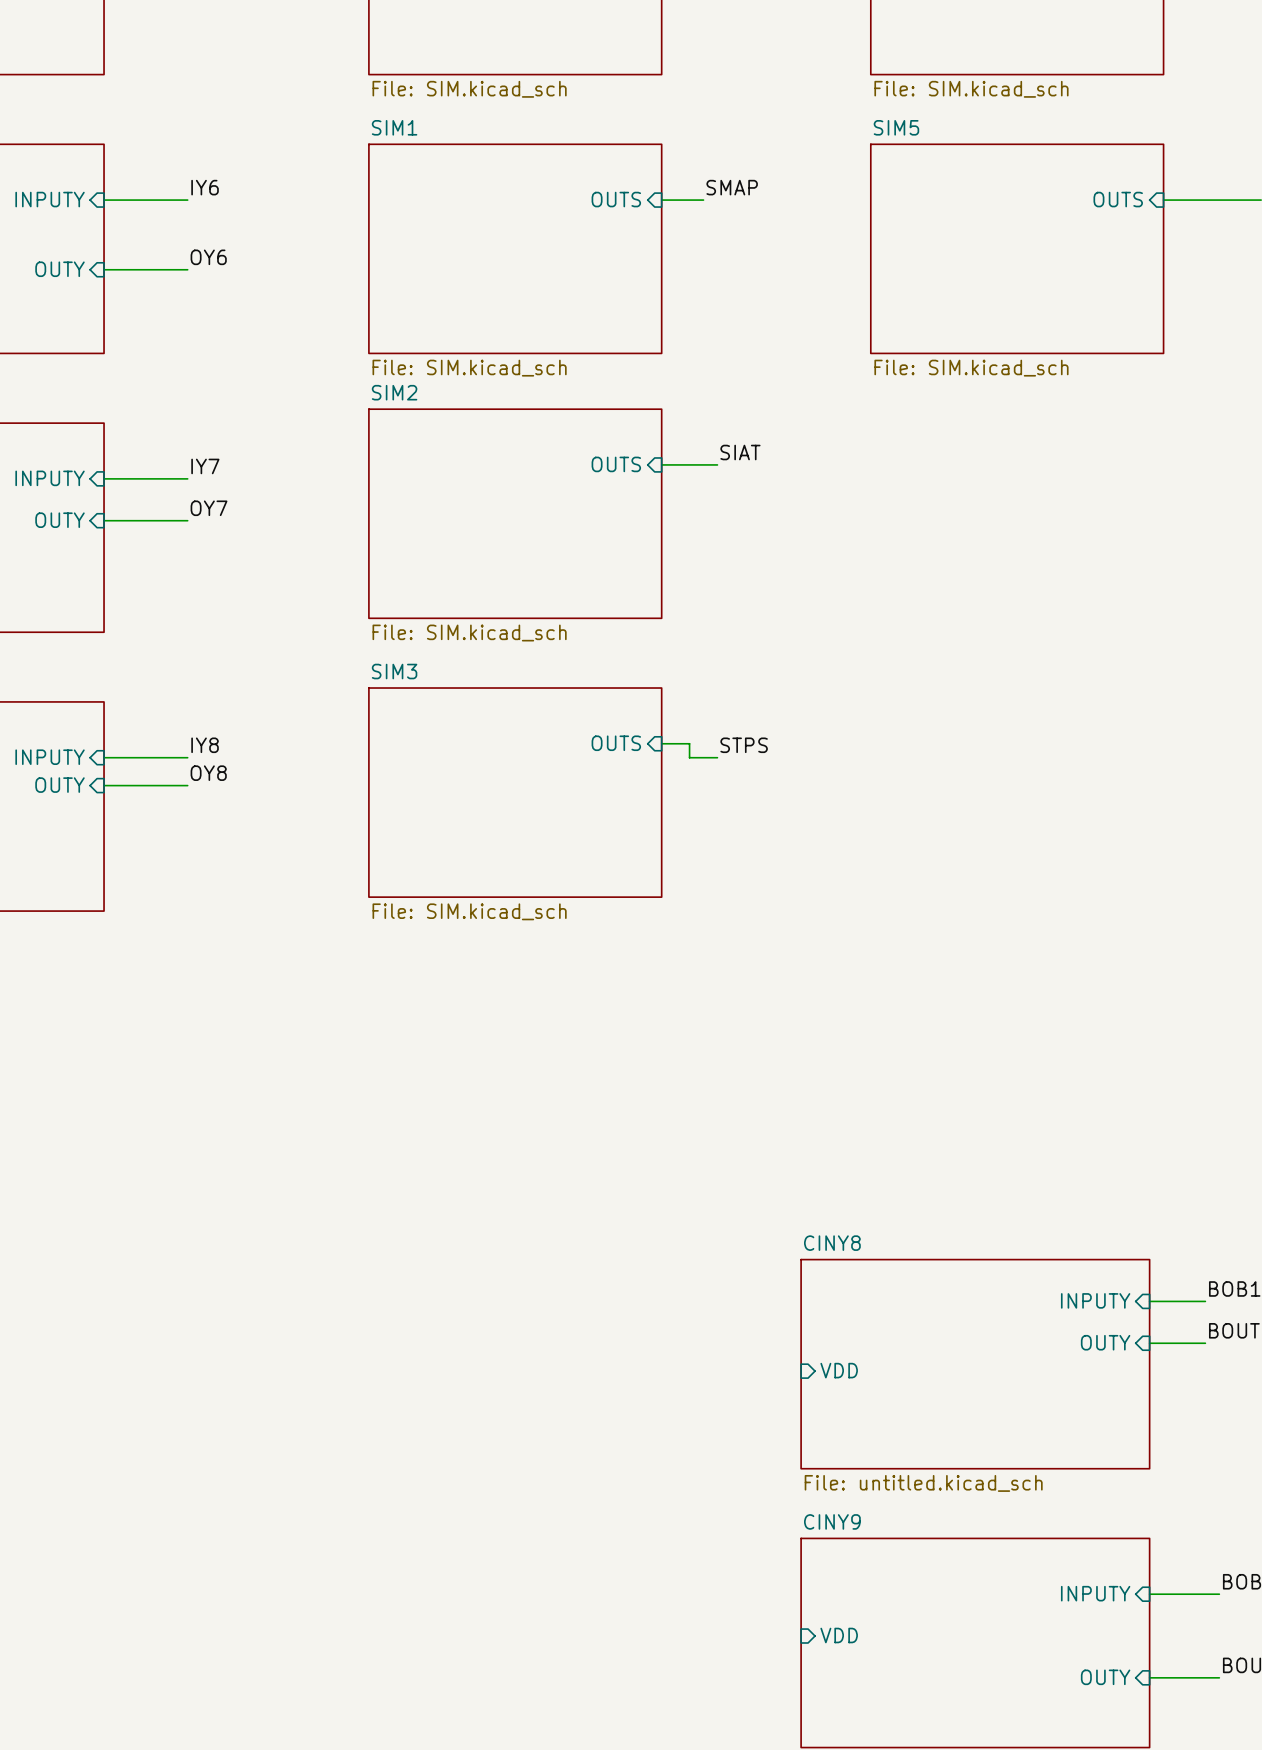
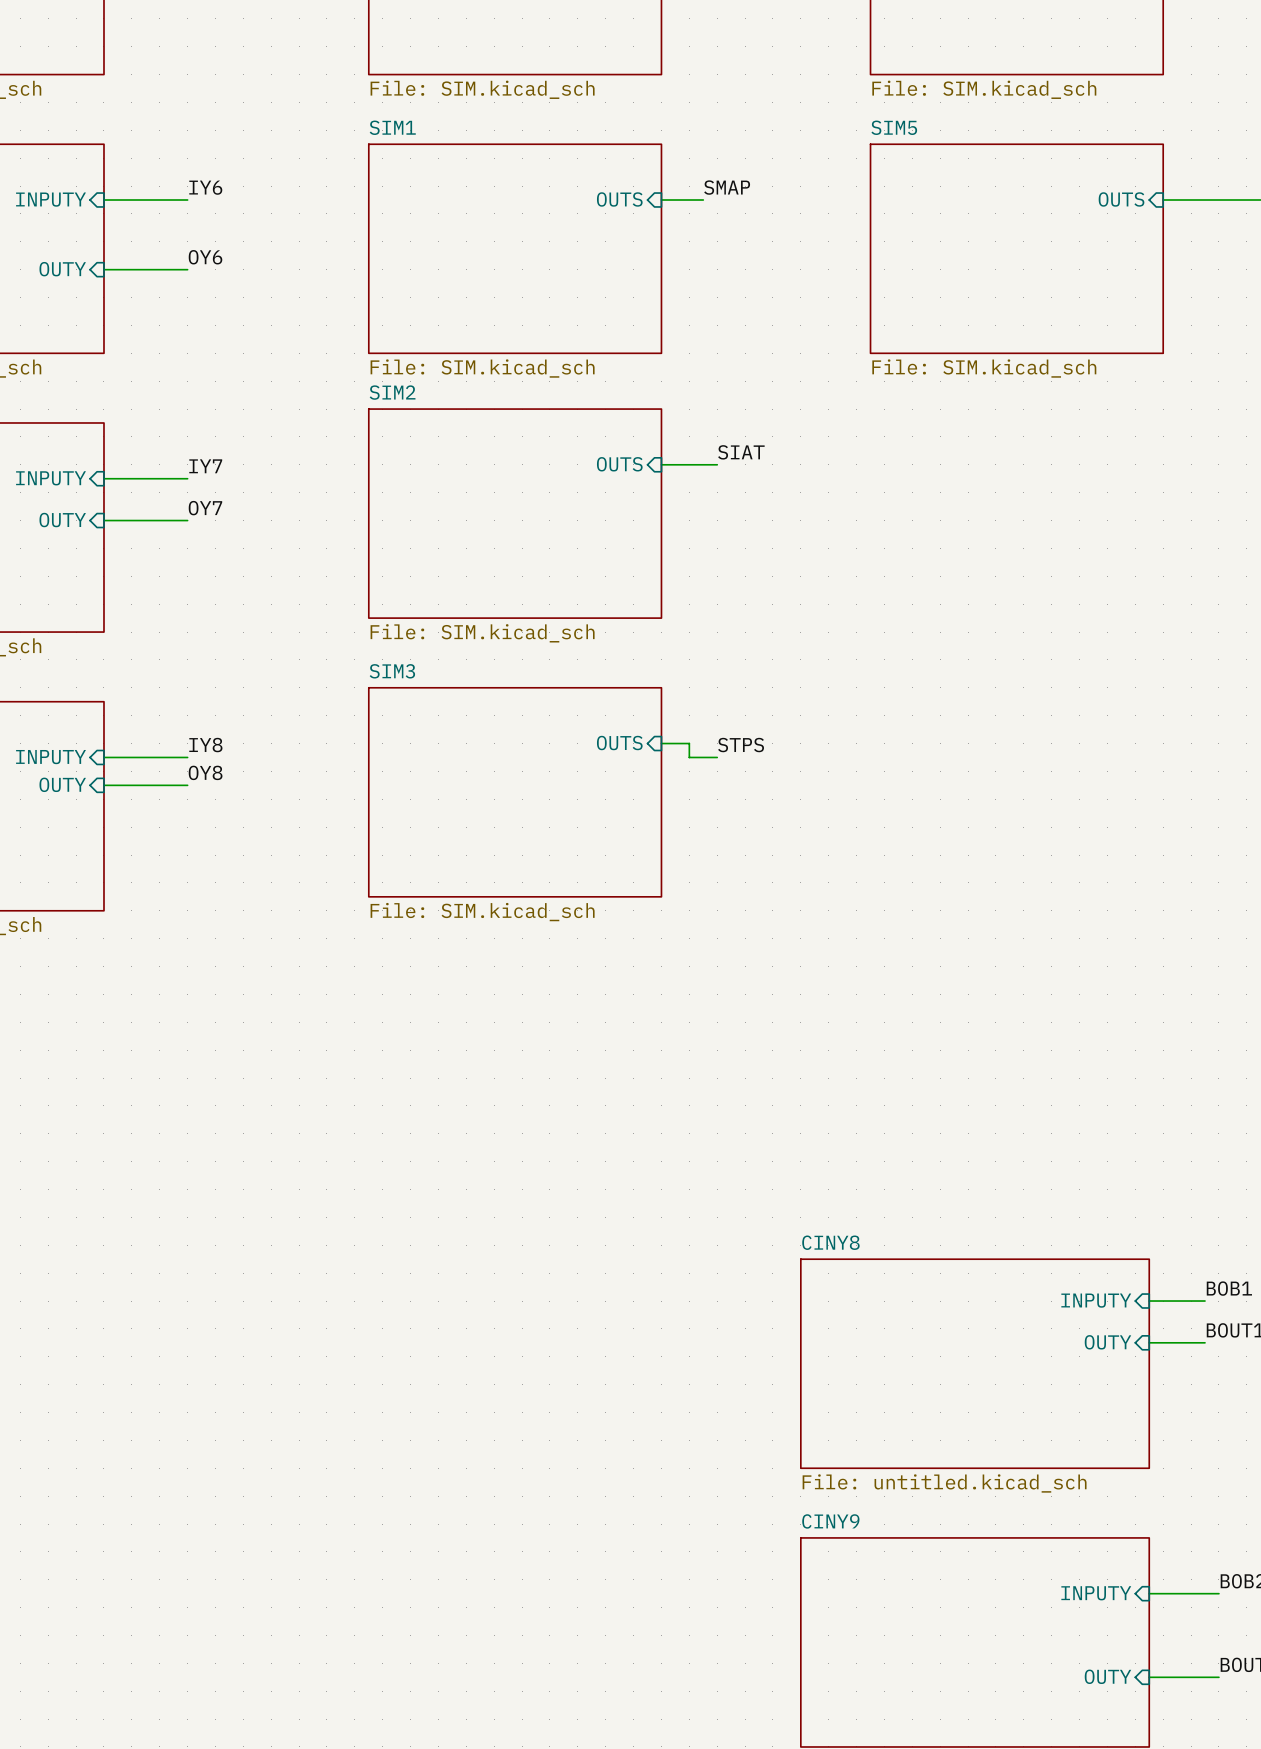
sheet pin: VDD (839, 1370) -> none
sheet pin: VDD (839, 1635) -> none

